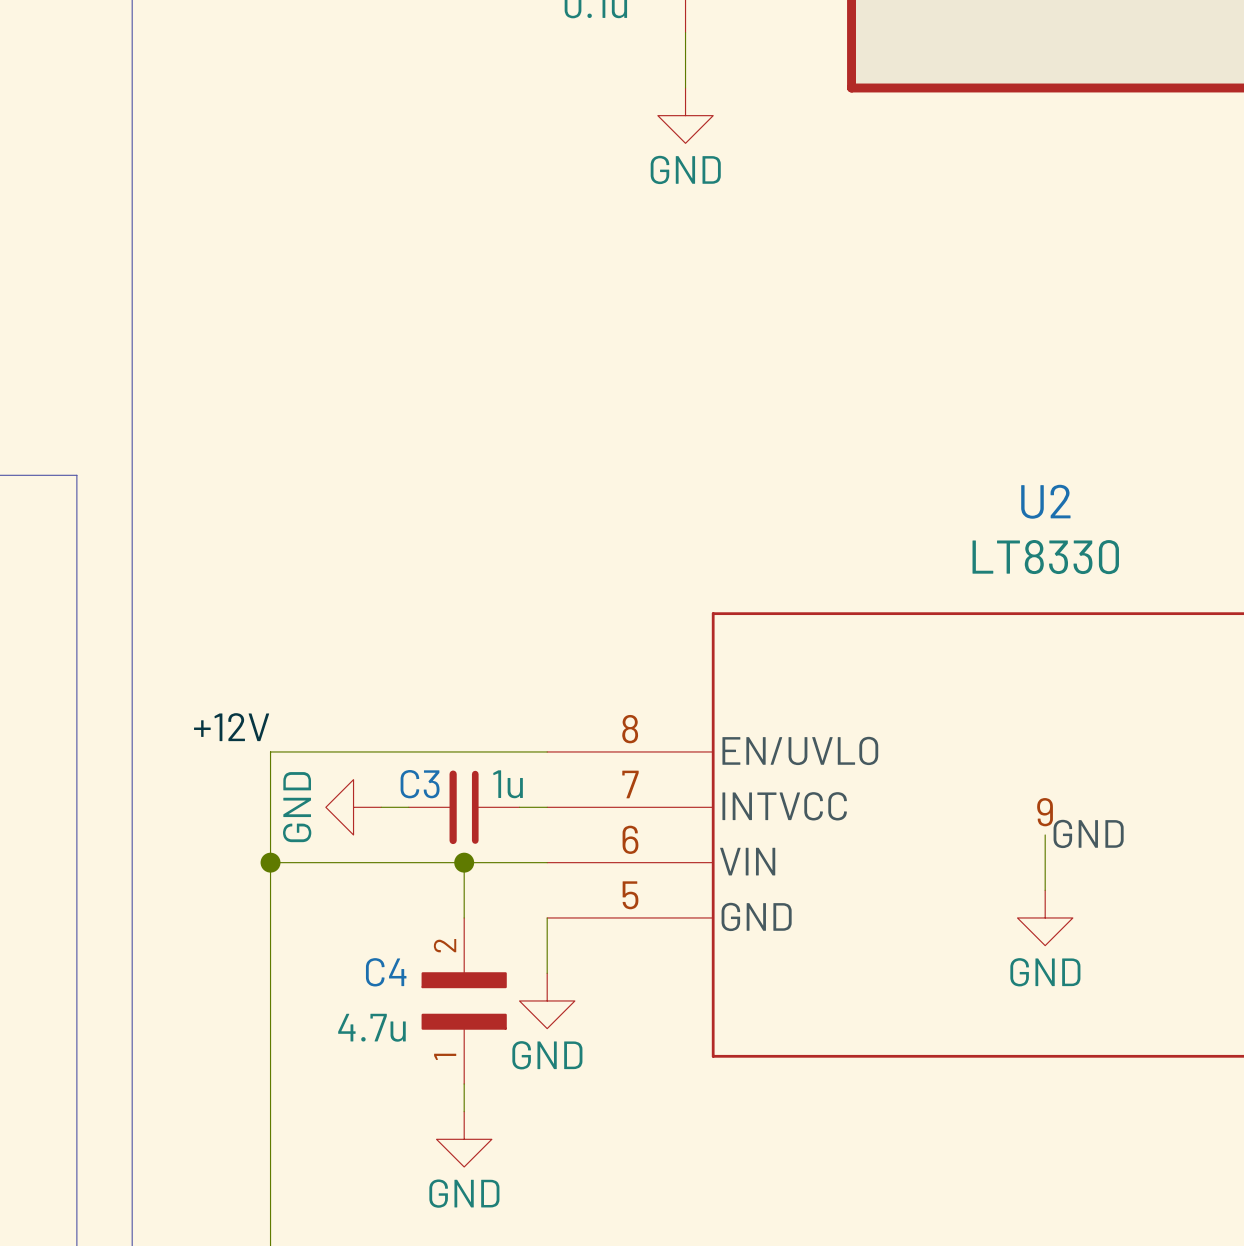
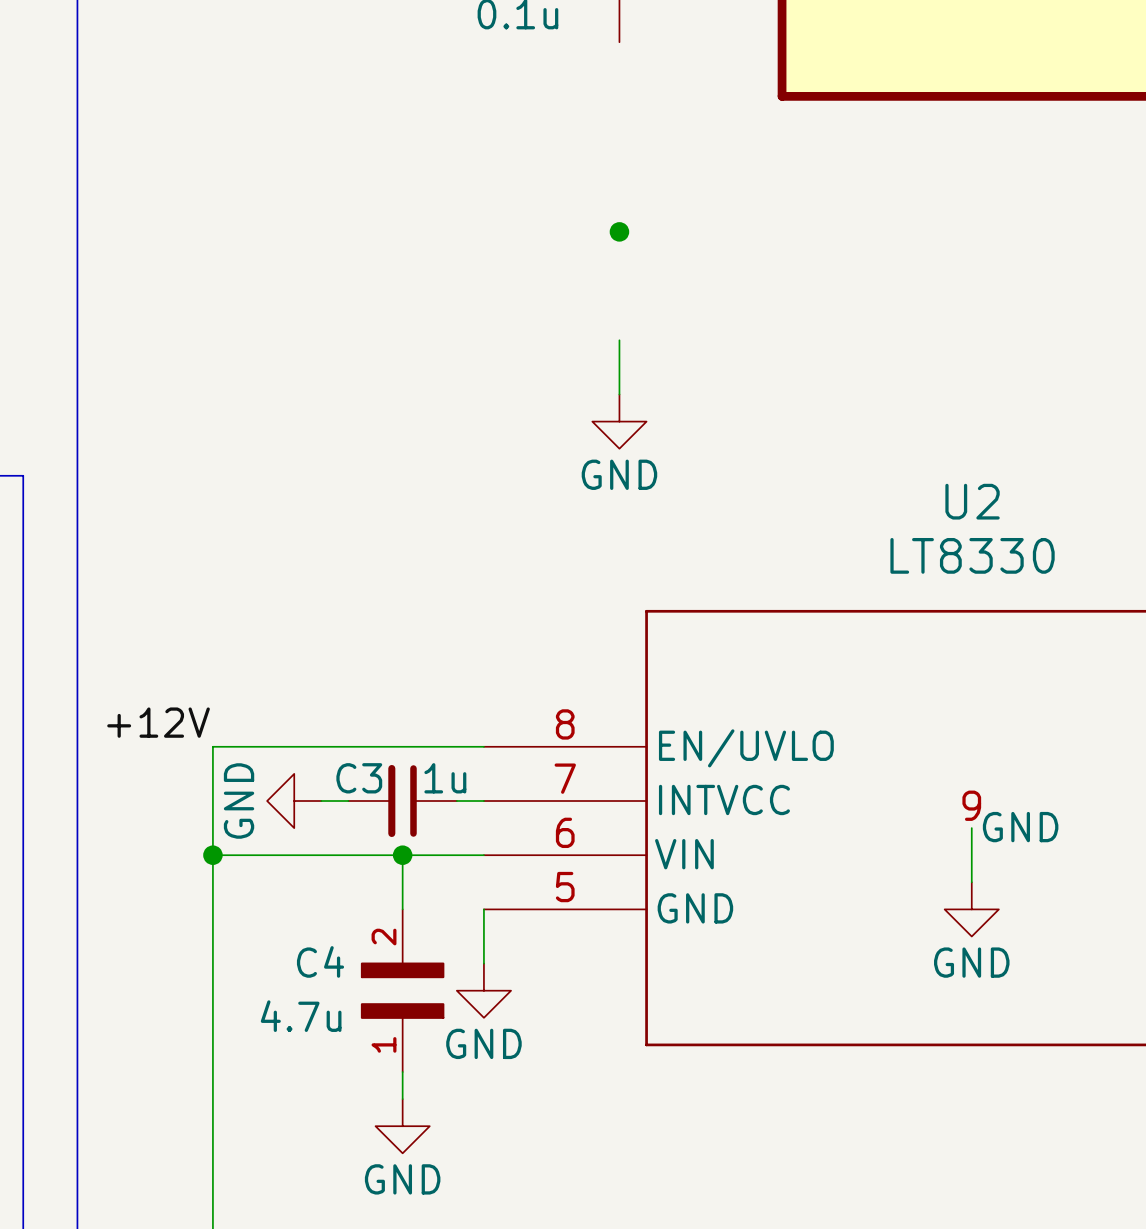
wire: (685, 32) (685, 87) -> (619, 340) (619, 394)
power symbol: GND (685, 115) -> none
junction: none -> (619, 231)
power symbol: none -> GND (619, 421)

